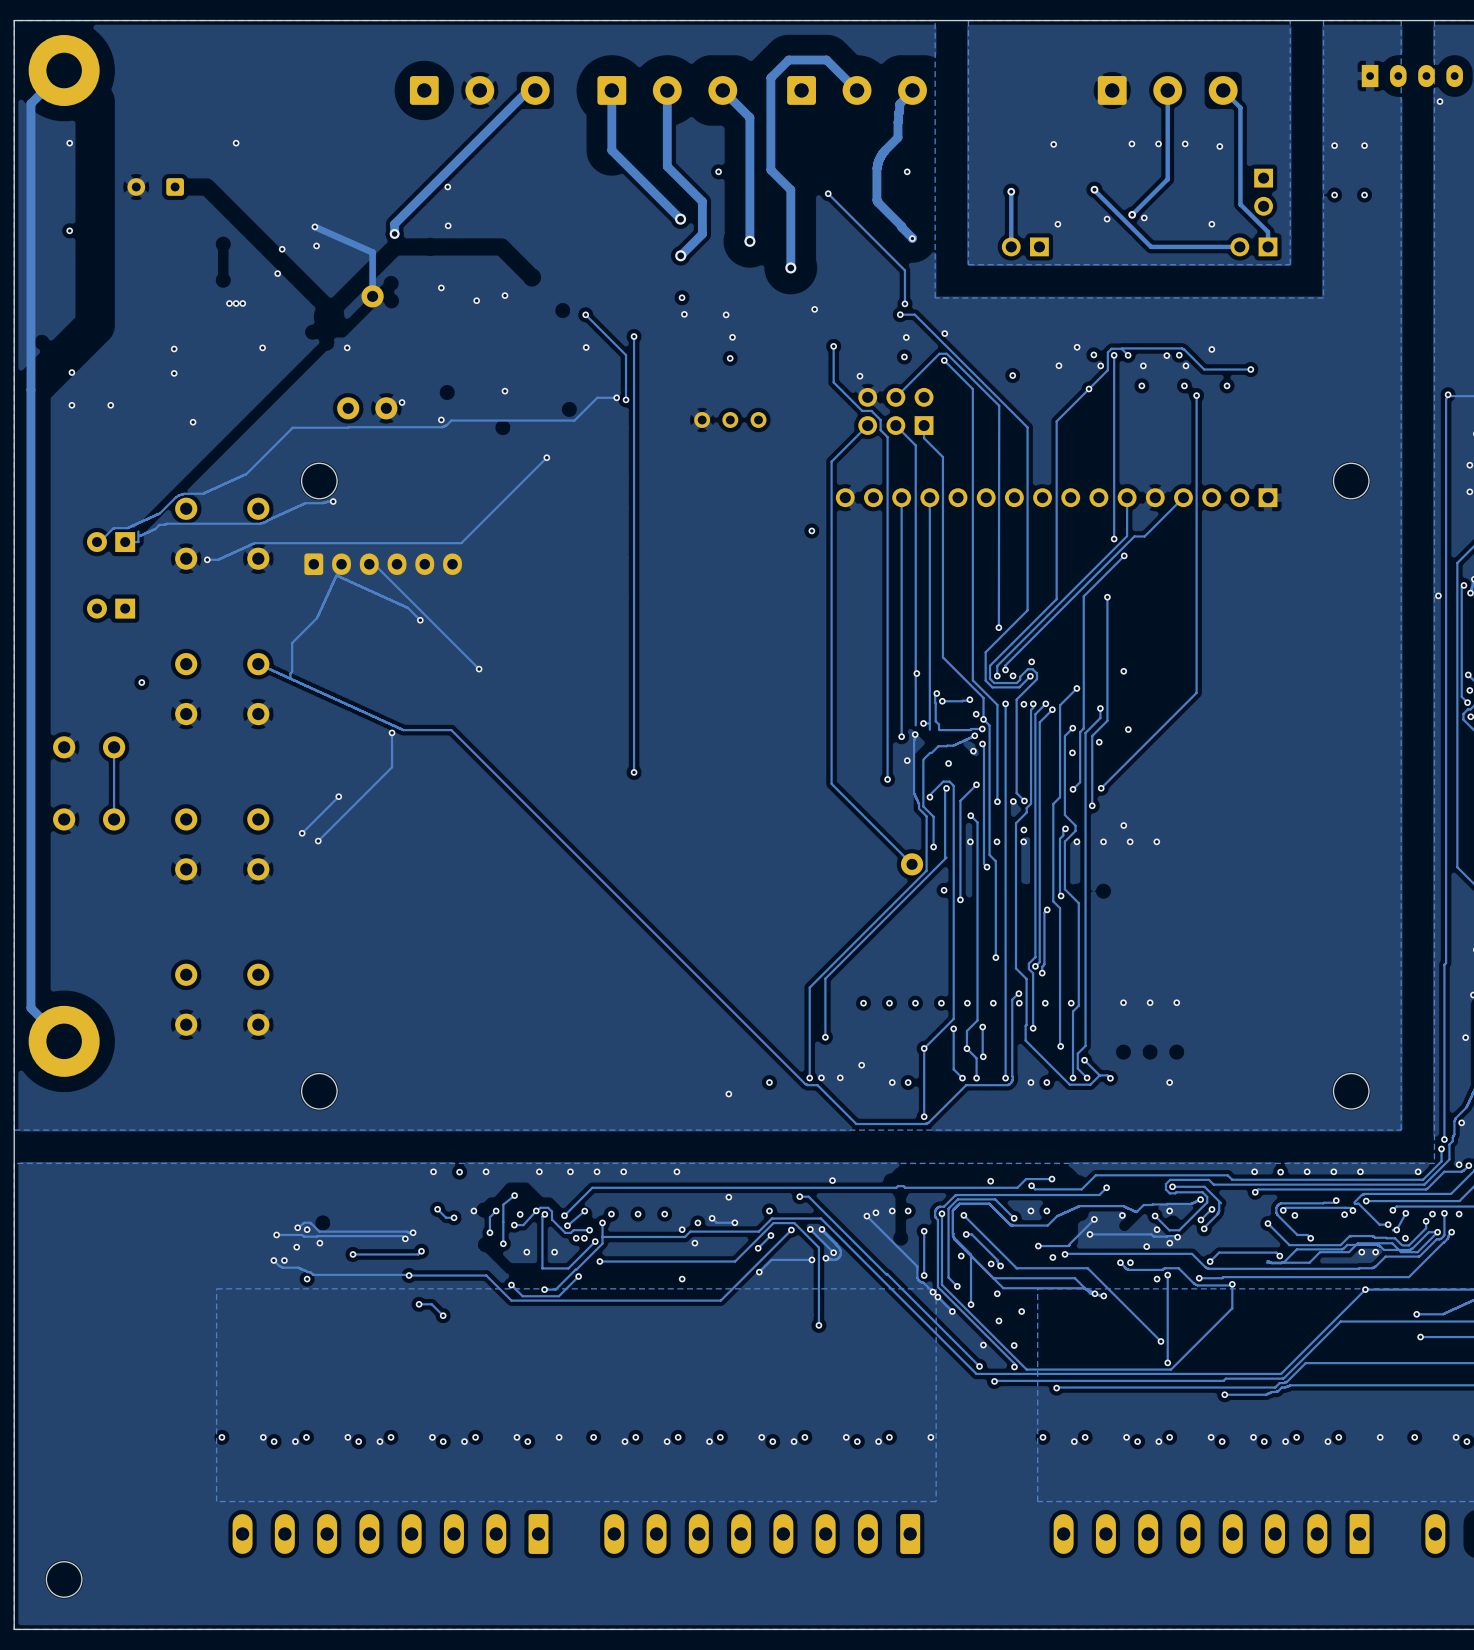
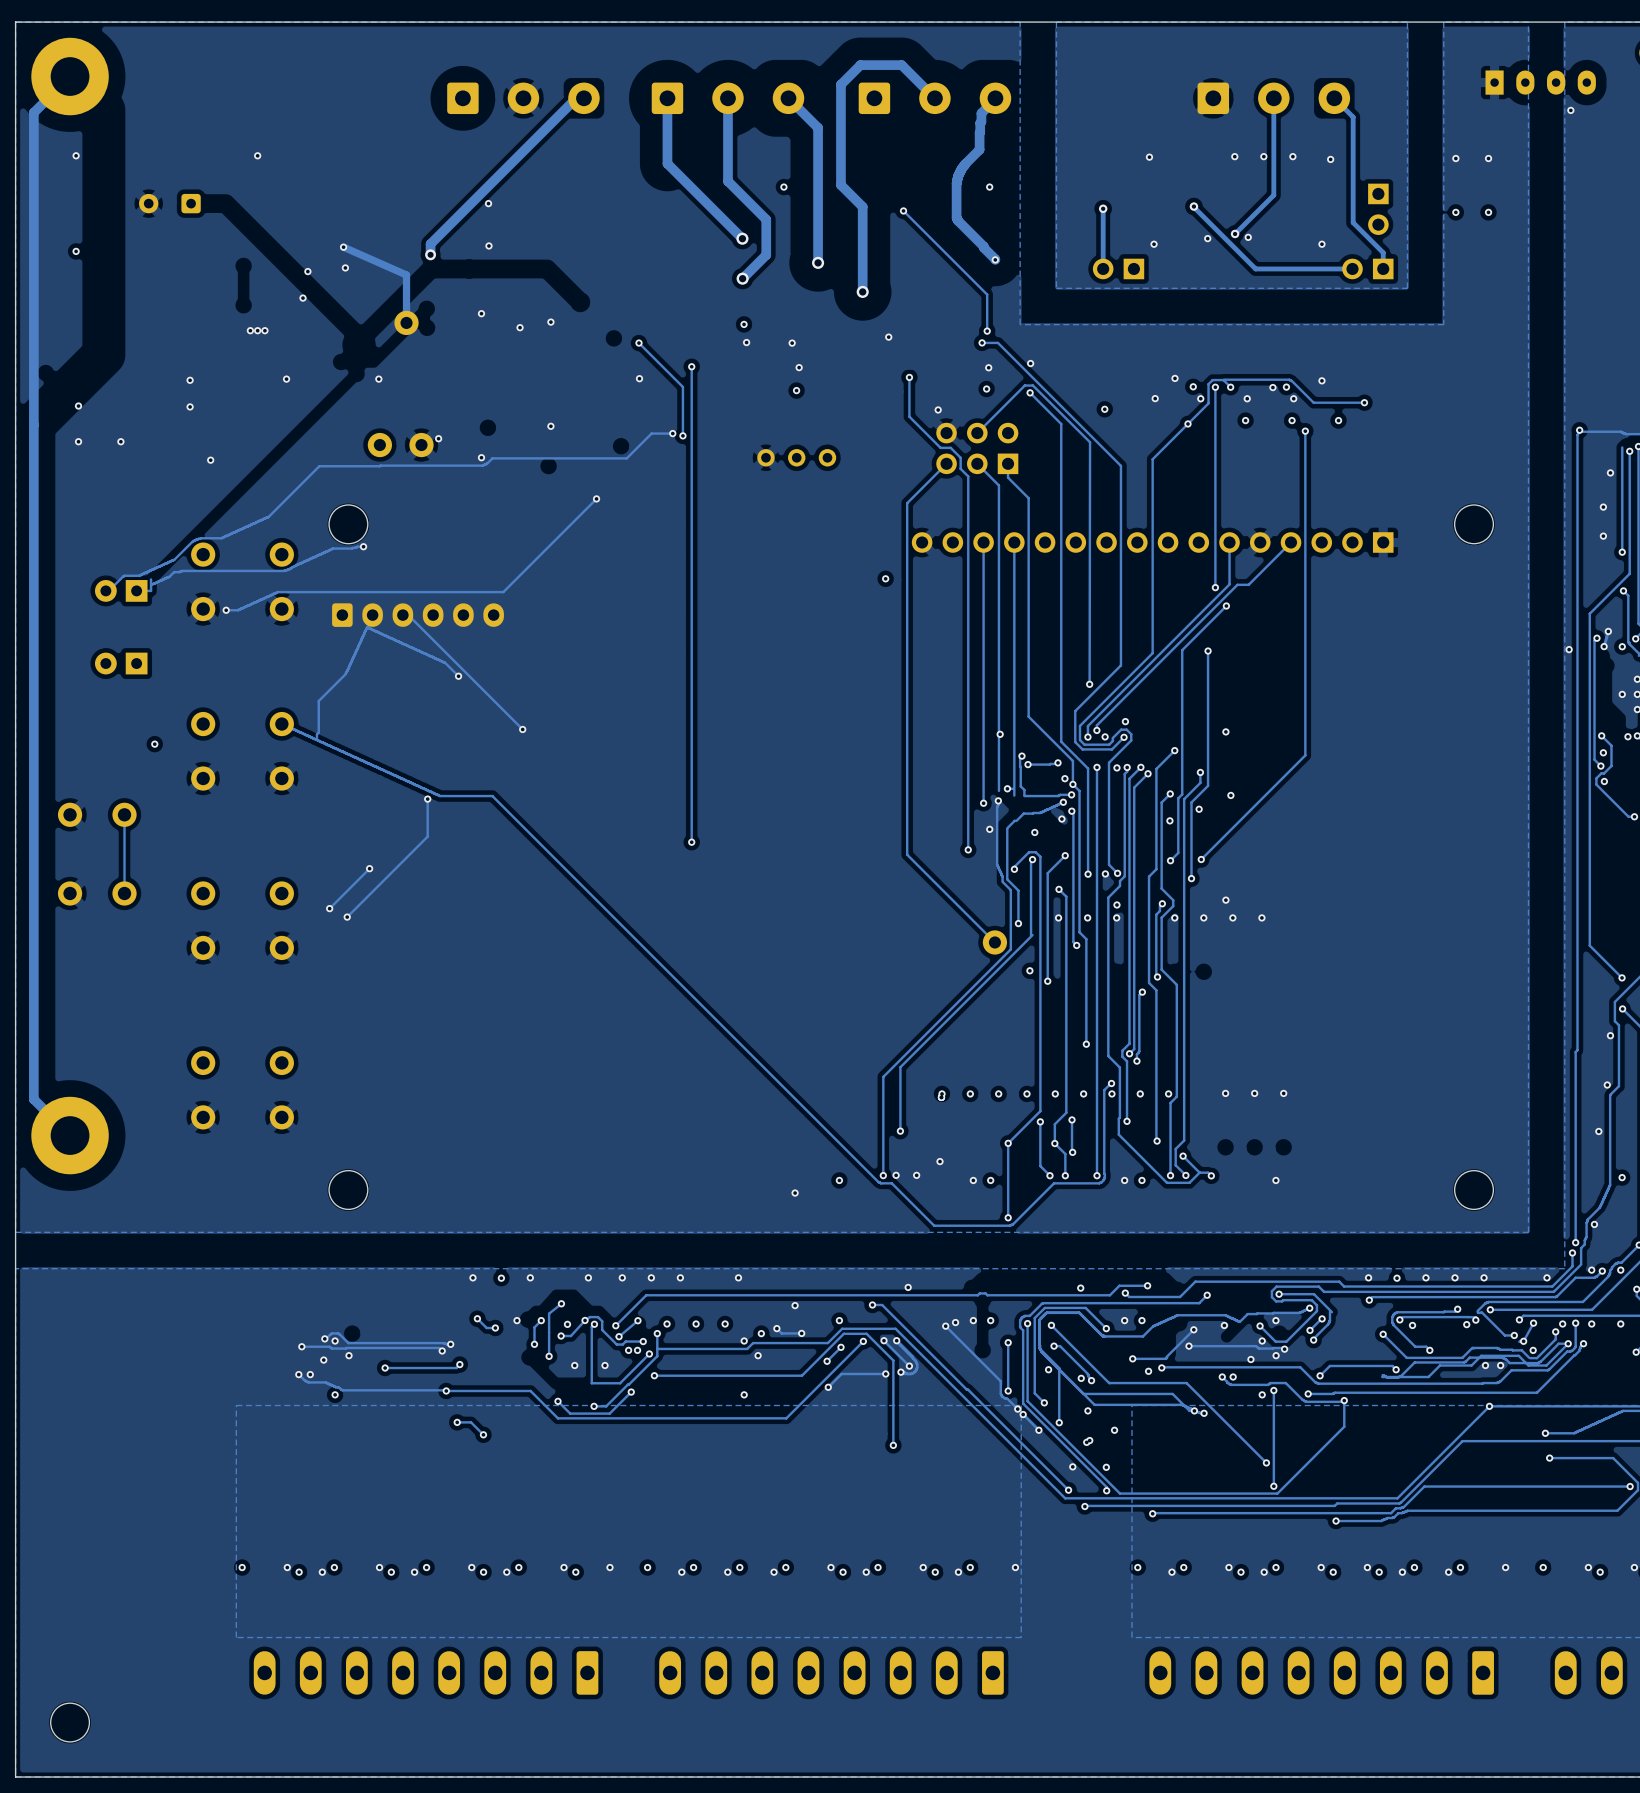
via: none -> (941, 1097)
via: none -> (1086, 1442)

